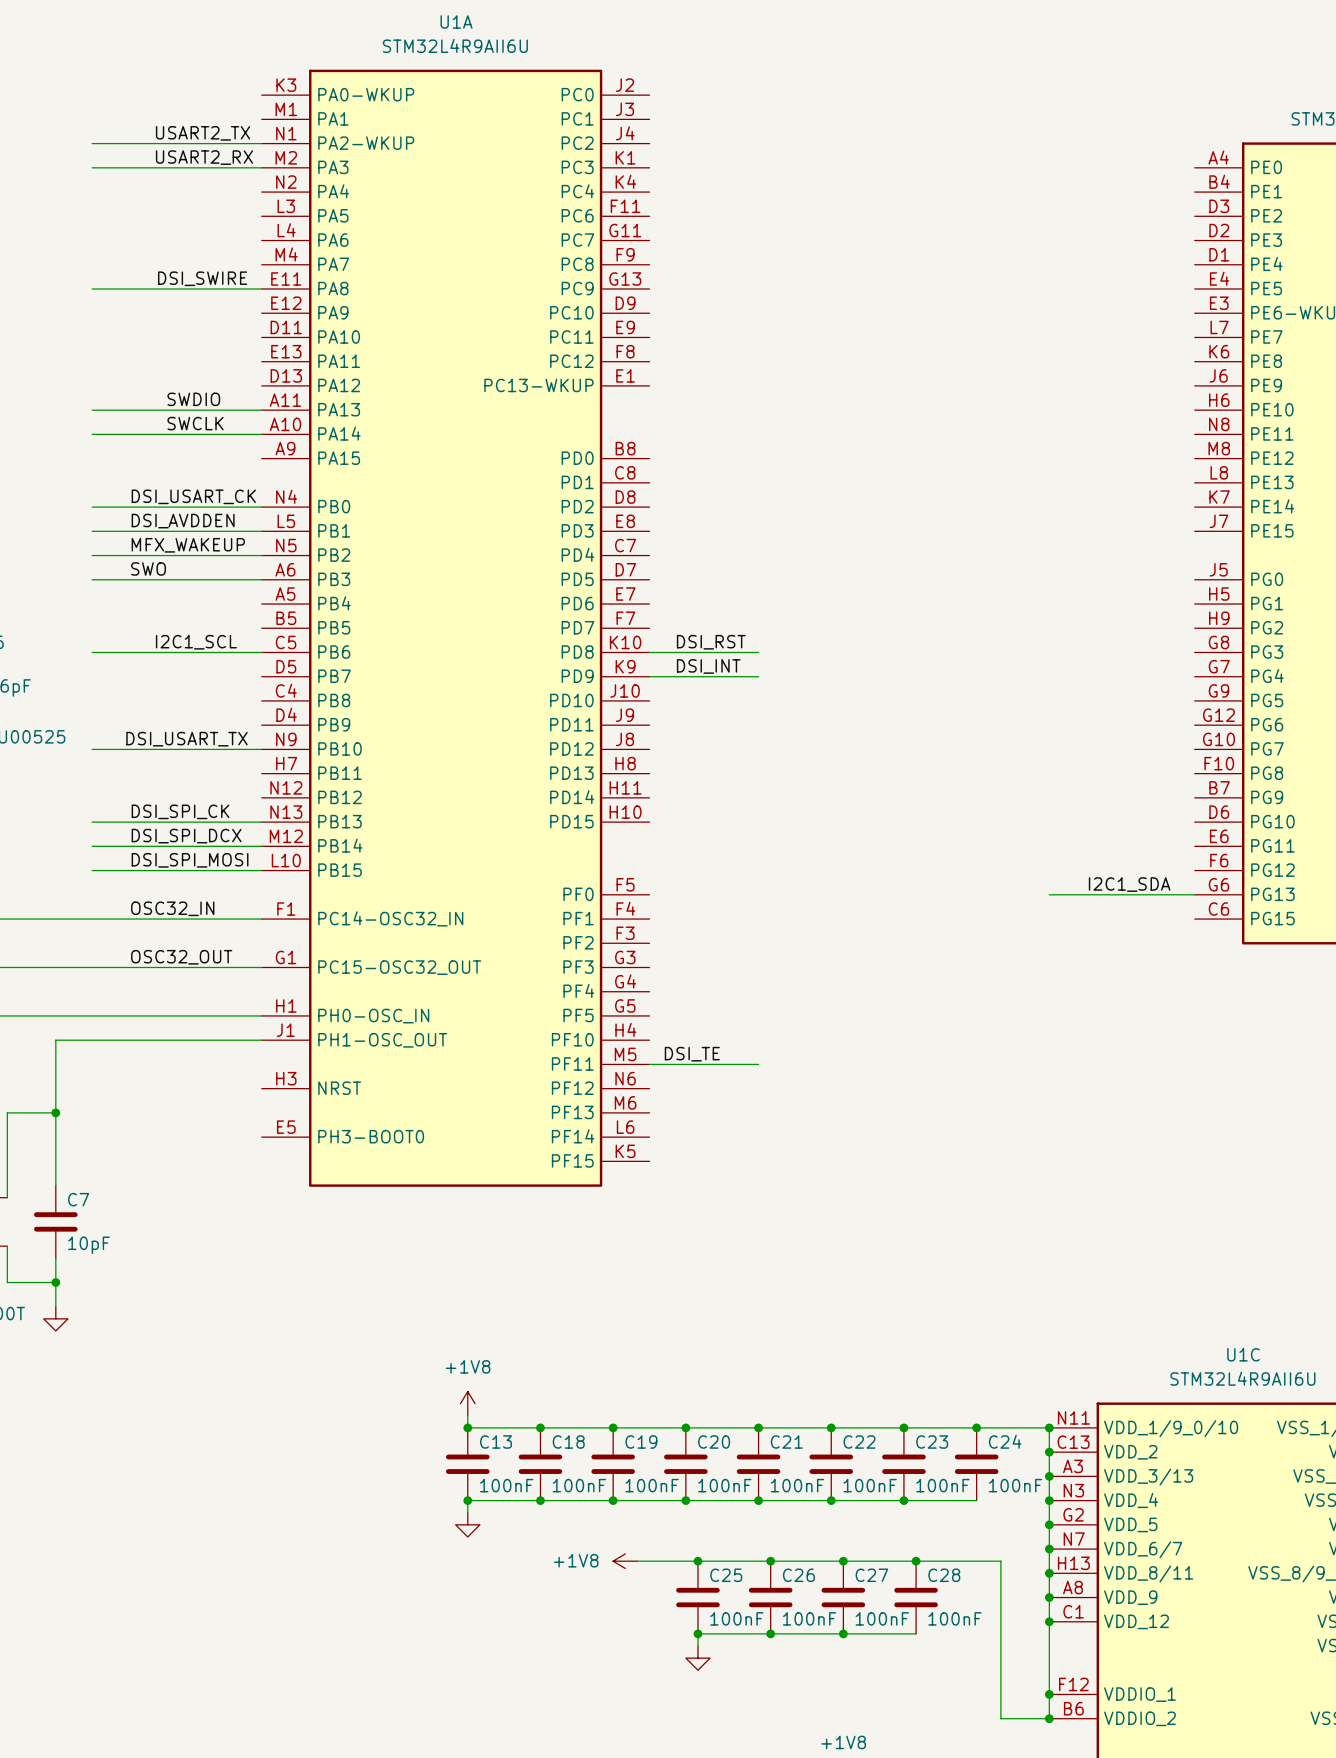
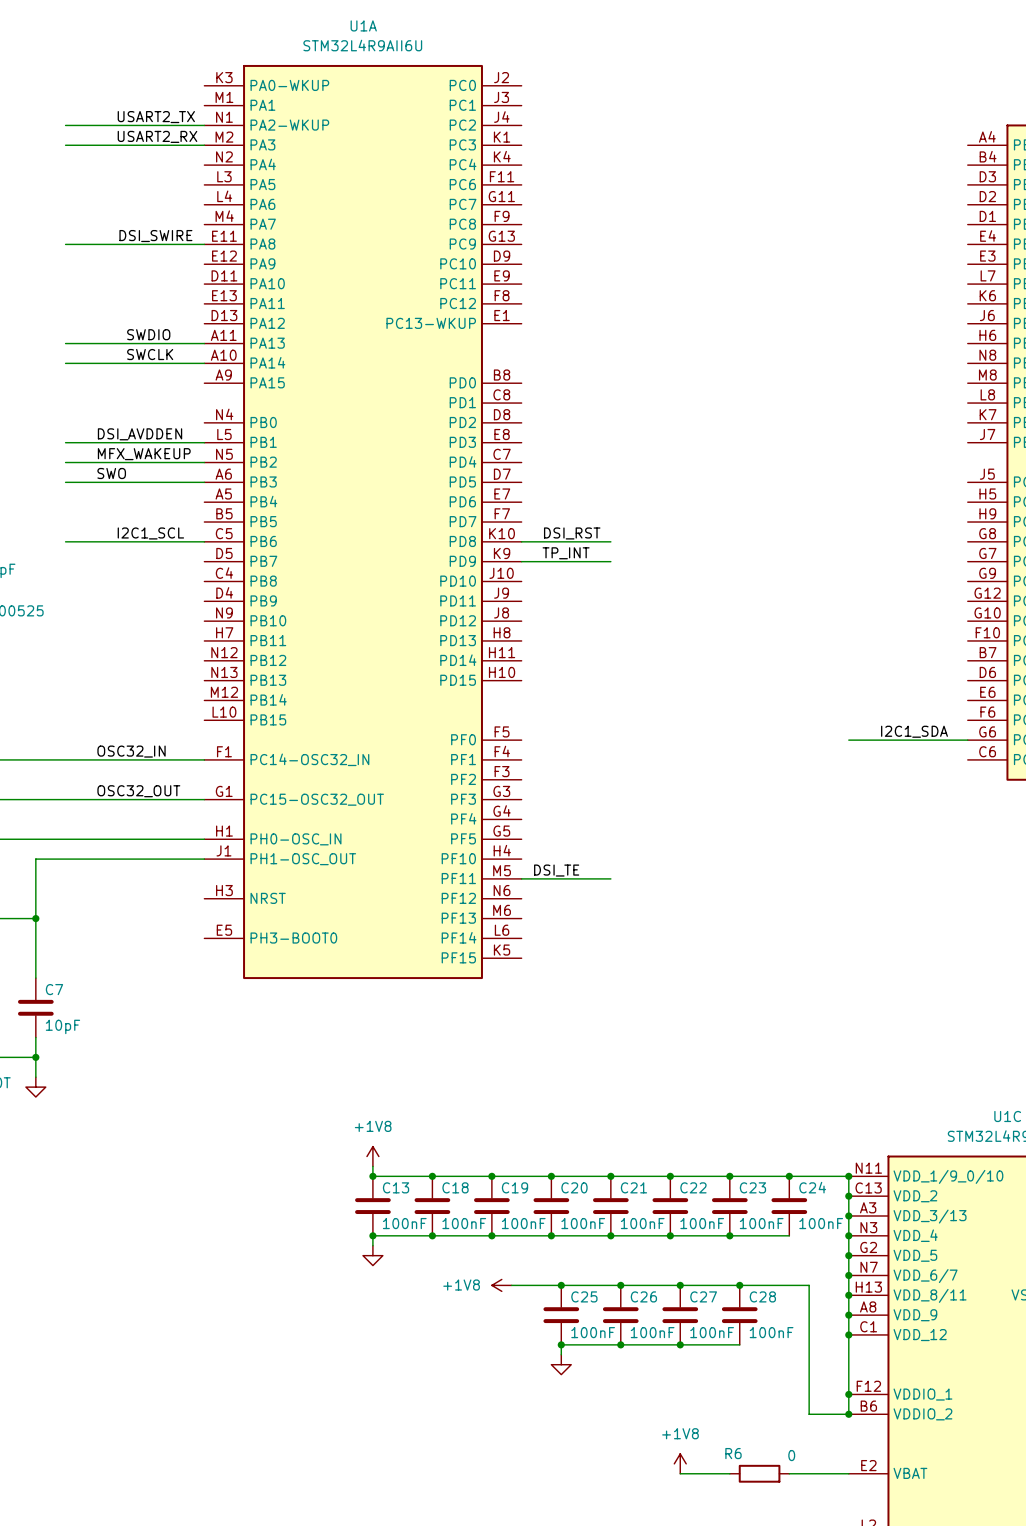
label: DSI_USART_CK (193, 496) -> none
wire: (92, 507) (261, 507) -> none
label: DSI_INT (708, 666) -> TP_INT (566, 553)
label: DSI_USART_TX (186, 739) -> none
wire: (92, 749) (261, 749) -> none
label: DSI_SPI_CK (180, 811) -> none
wire: (92, 822) (261, 822) -> none
label: DSI_SPI_DCX (186, 836) -> none
wire: (92, 846) (261, 846) -> none
label: DSI_SPI_MOSI (190, 860) -> none
wire: (92, 870) (261, 870) -> none

